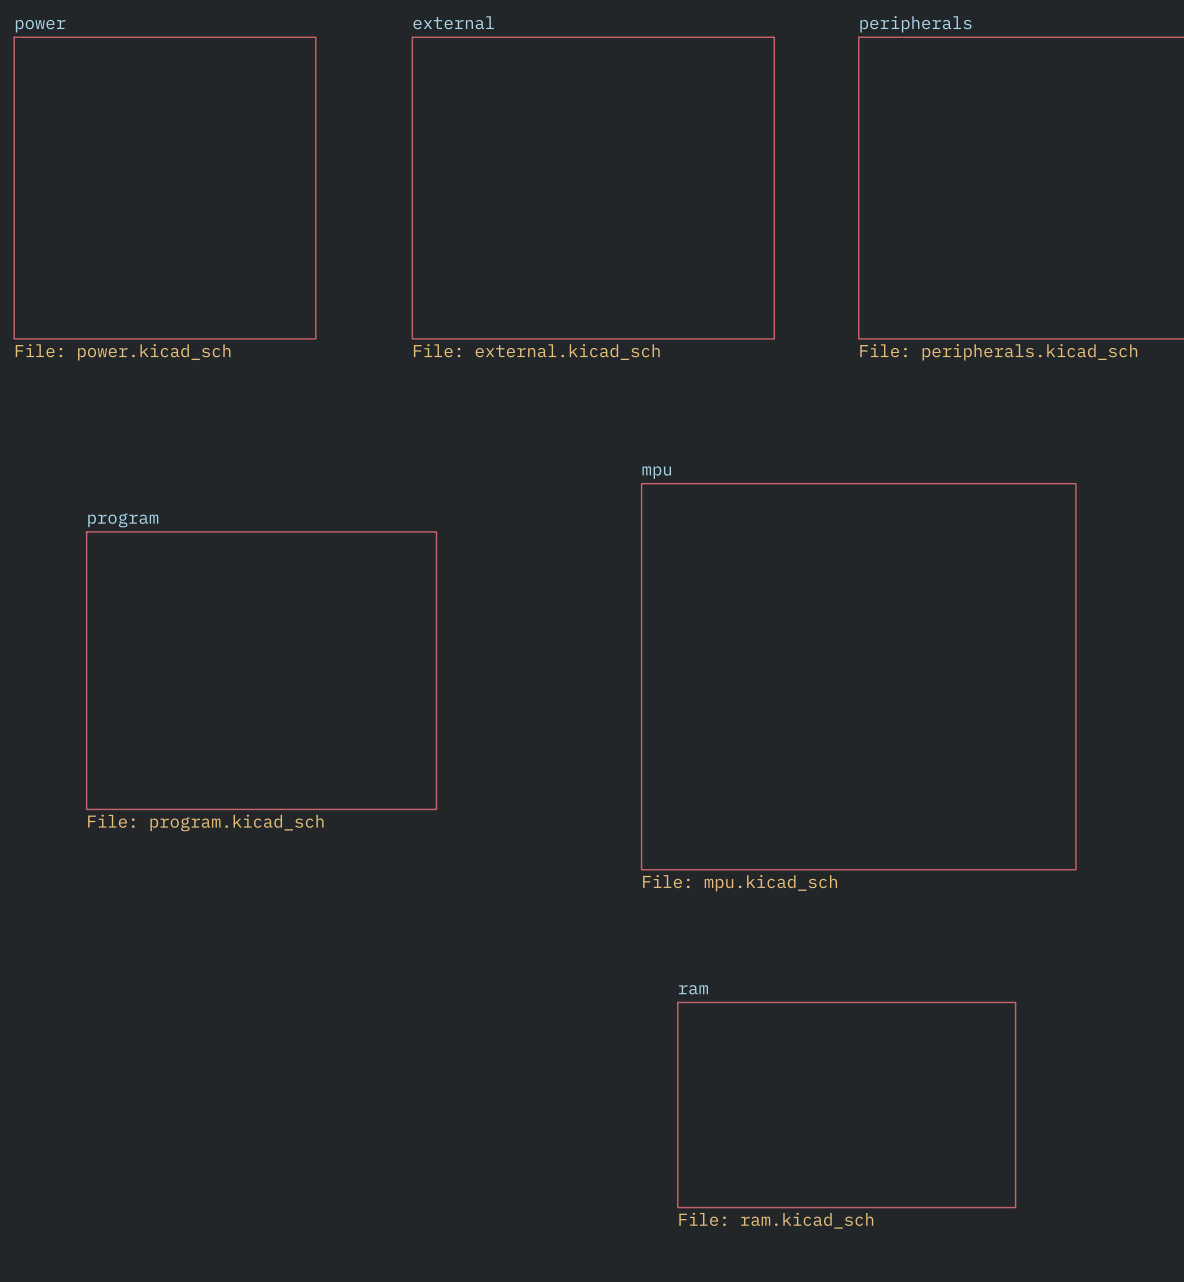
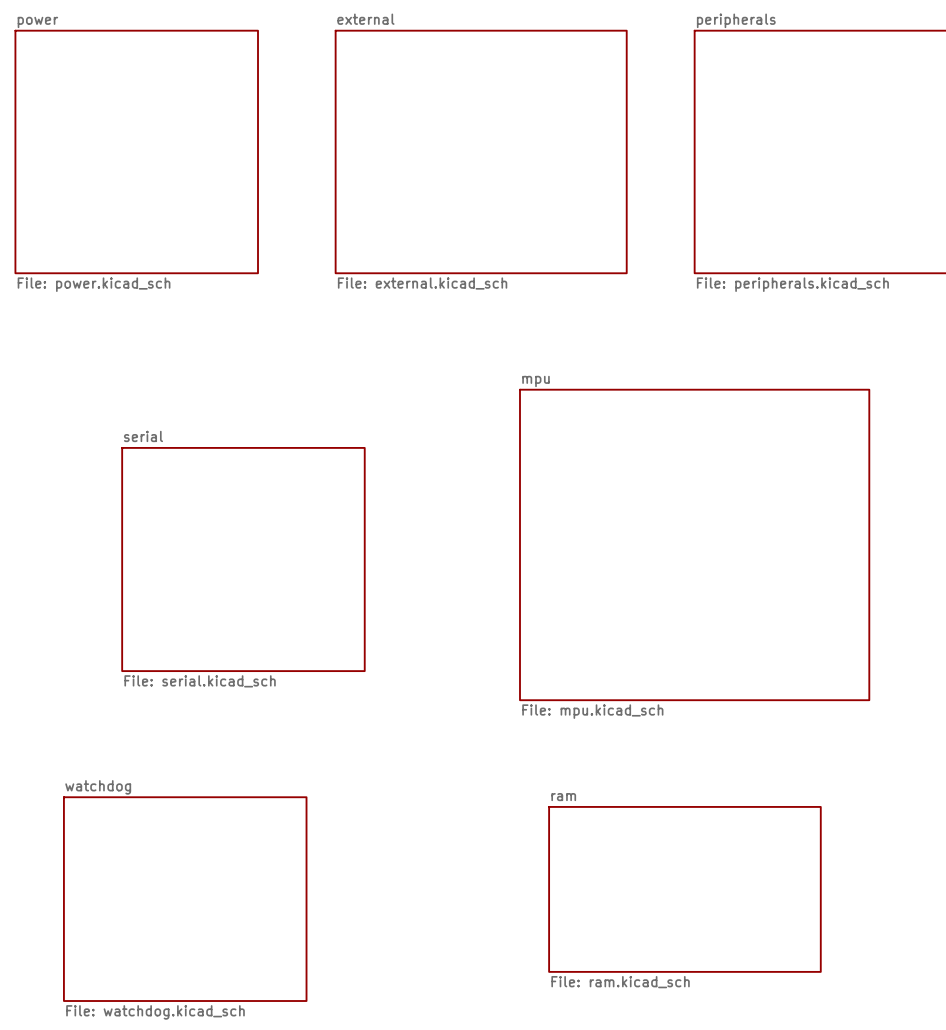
sheet program: File: program.kicad_sch (261, 670) -> none
sheet serial: none -> File: serial.kicad_sch (243, 559)
sheet watchdog: none -> File: watchdog.kicad_sch (185, 899)

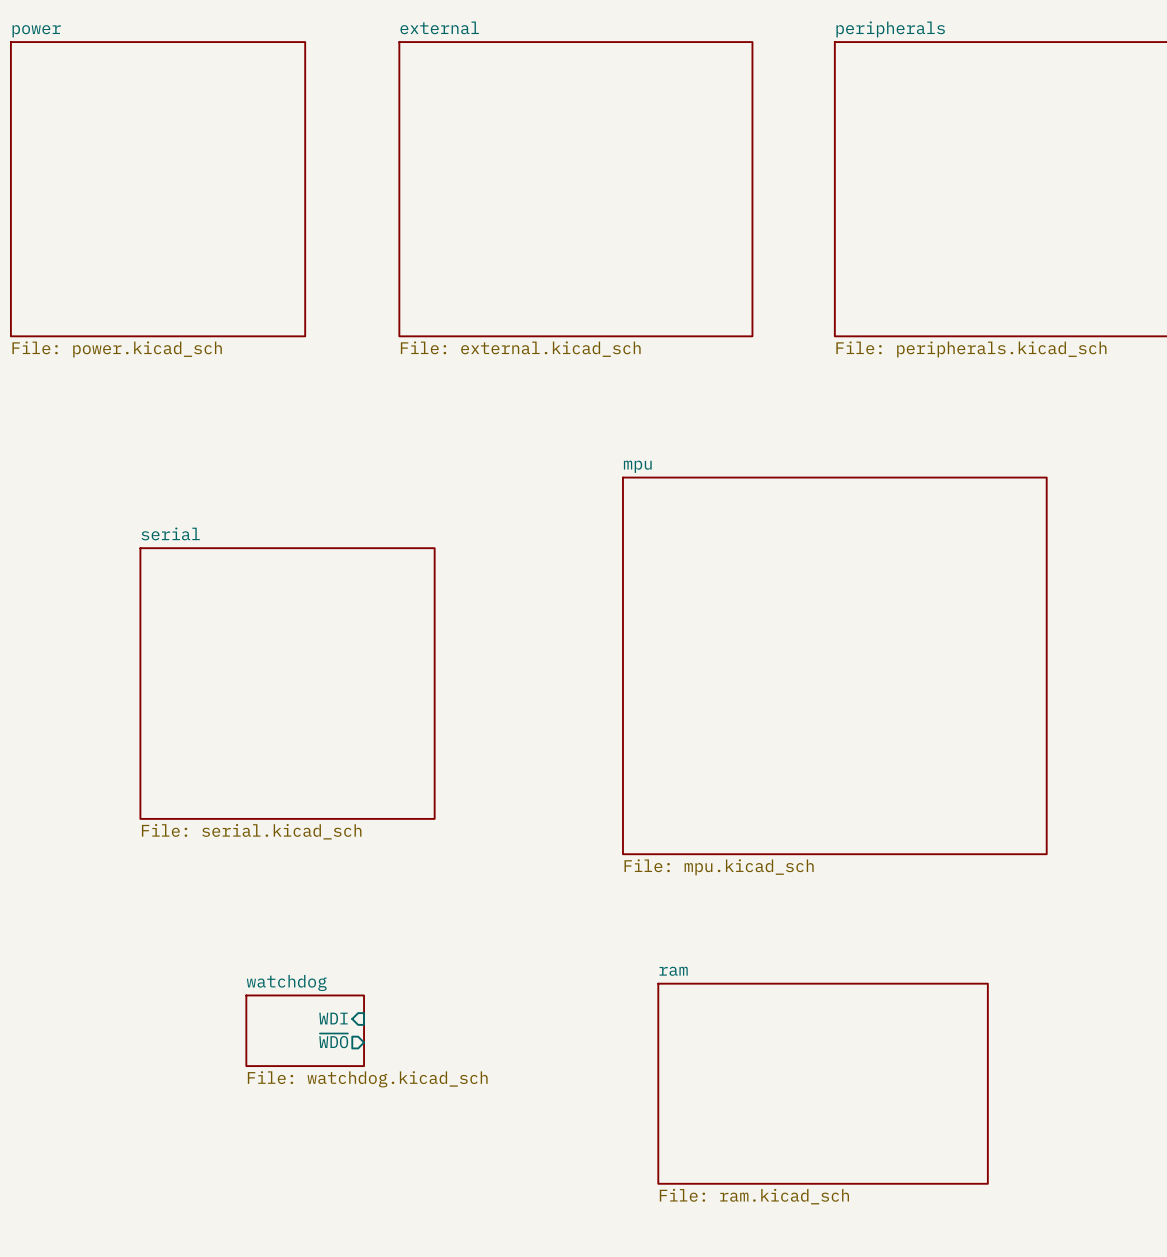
sheet pin: none -> WDI (333, 1018)
sheet watchdog: none -> File: watchdog.kicad_sch (305, 1030)
sheet pin: none -> ~{WDO} (333, 1040)
sheet watchdog: File: watchdog.kicad_sch (185, 899) -> none

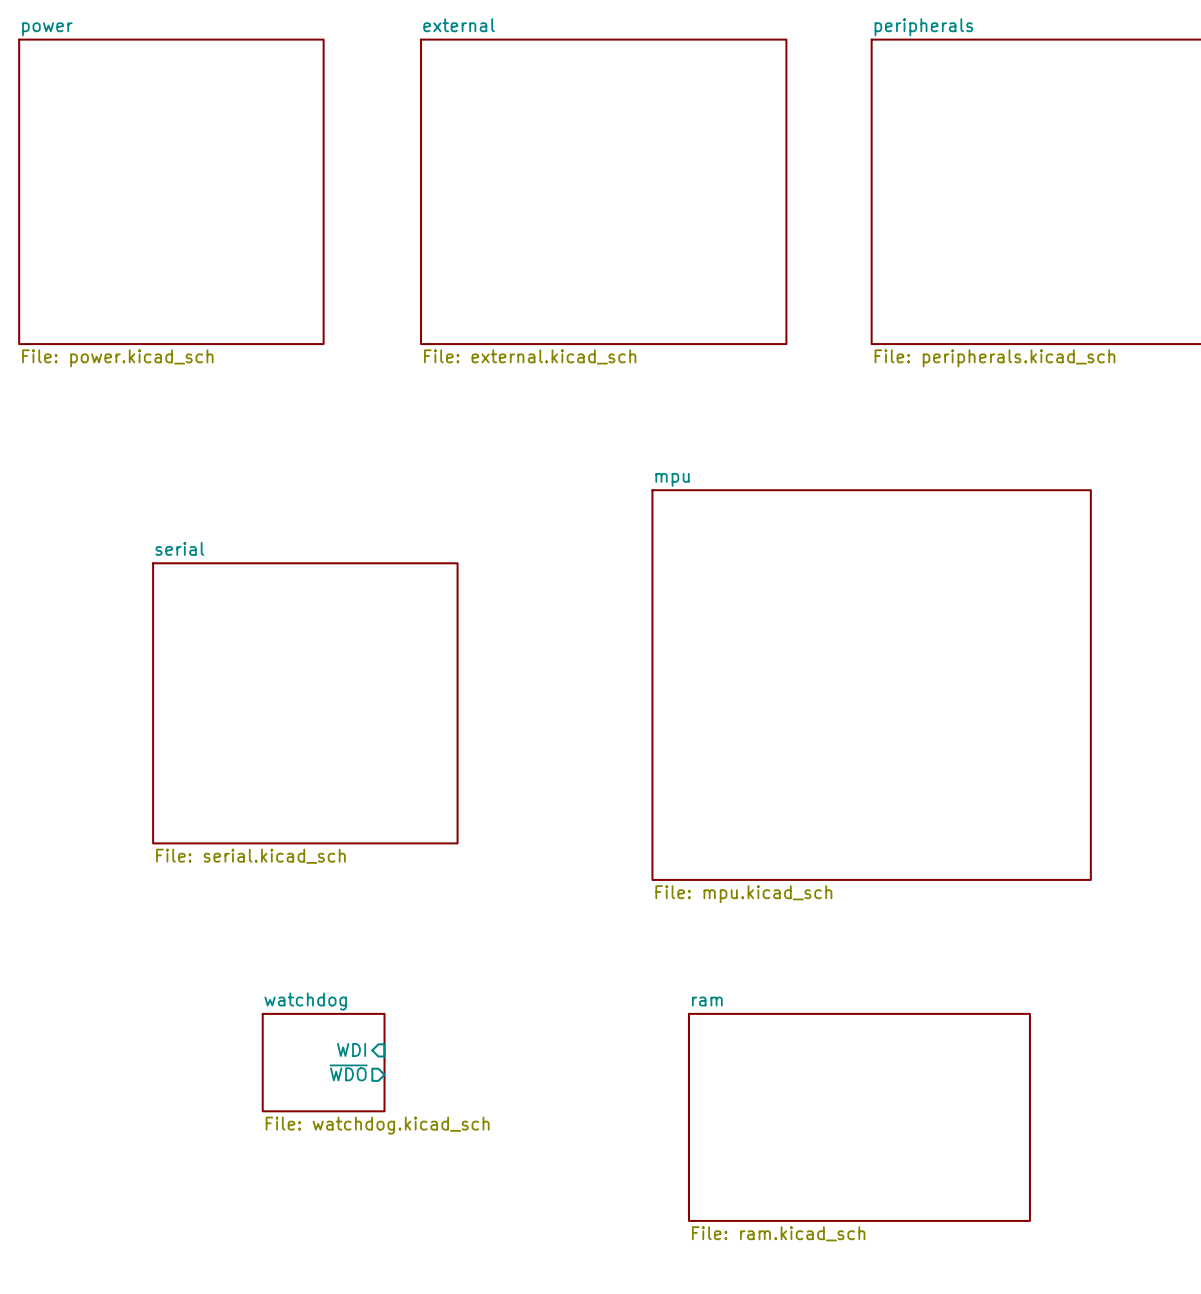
sheet watchdog shape: [245, 994, 365, 1067] -> [261, 1013, 386, 1113]

